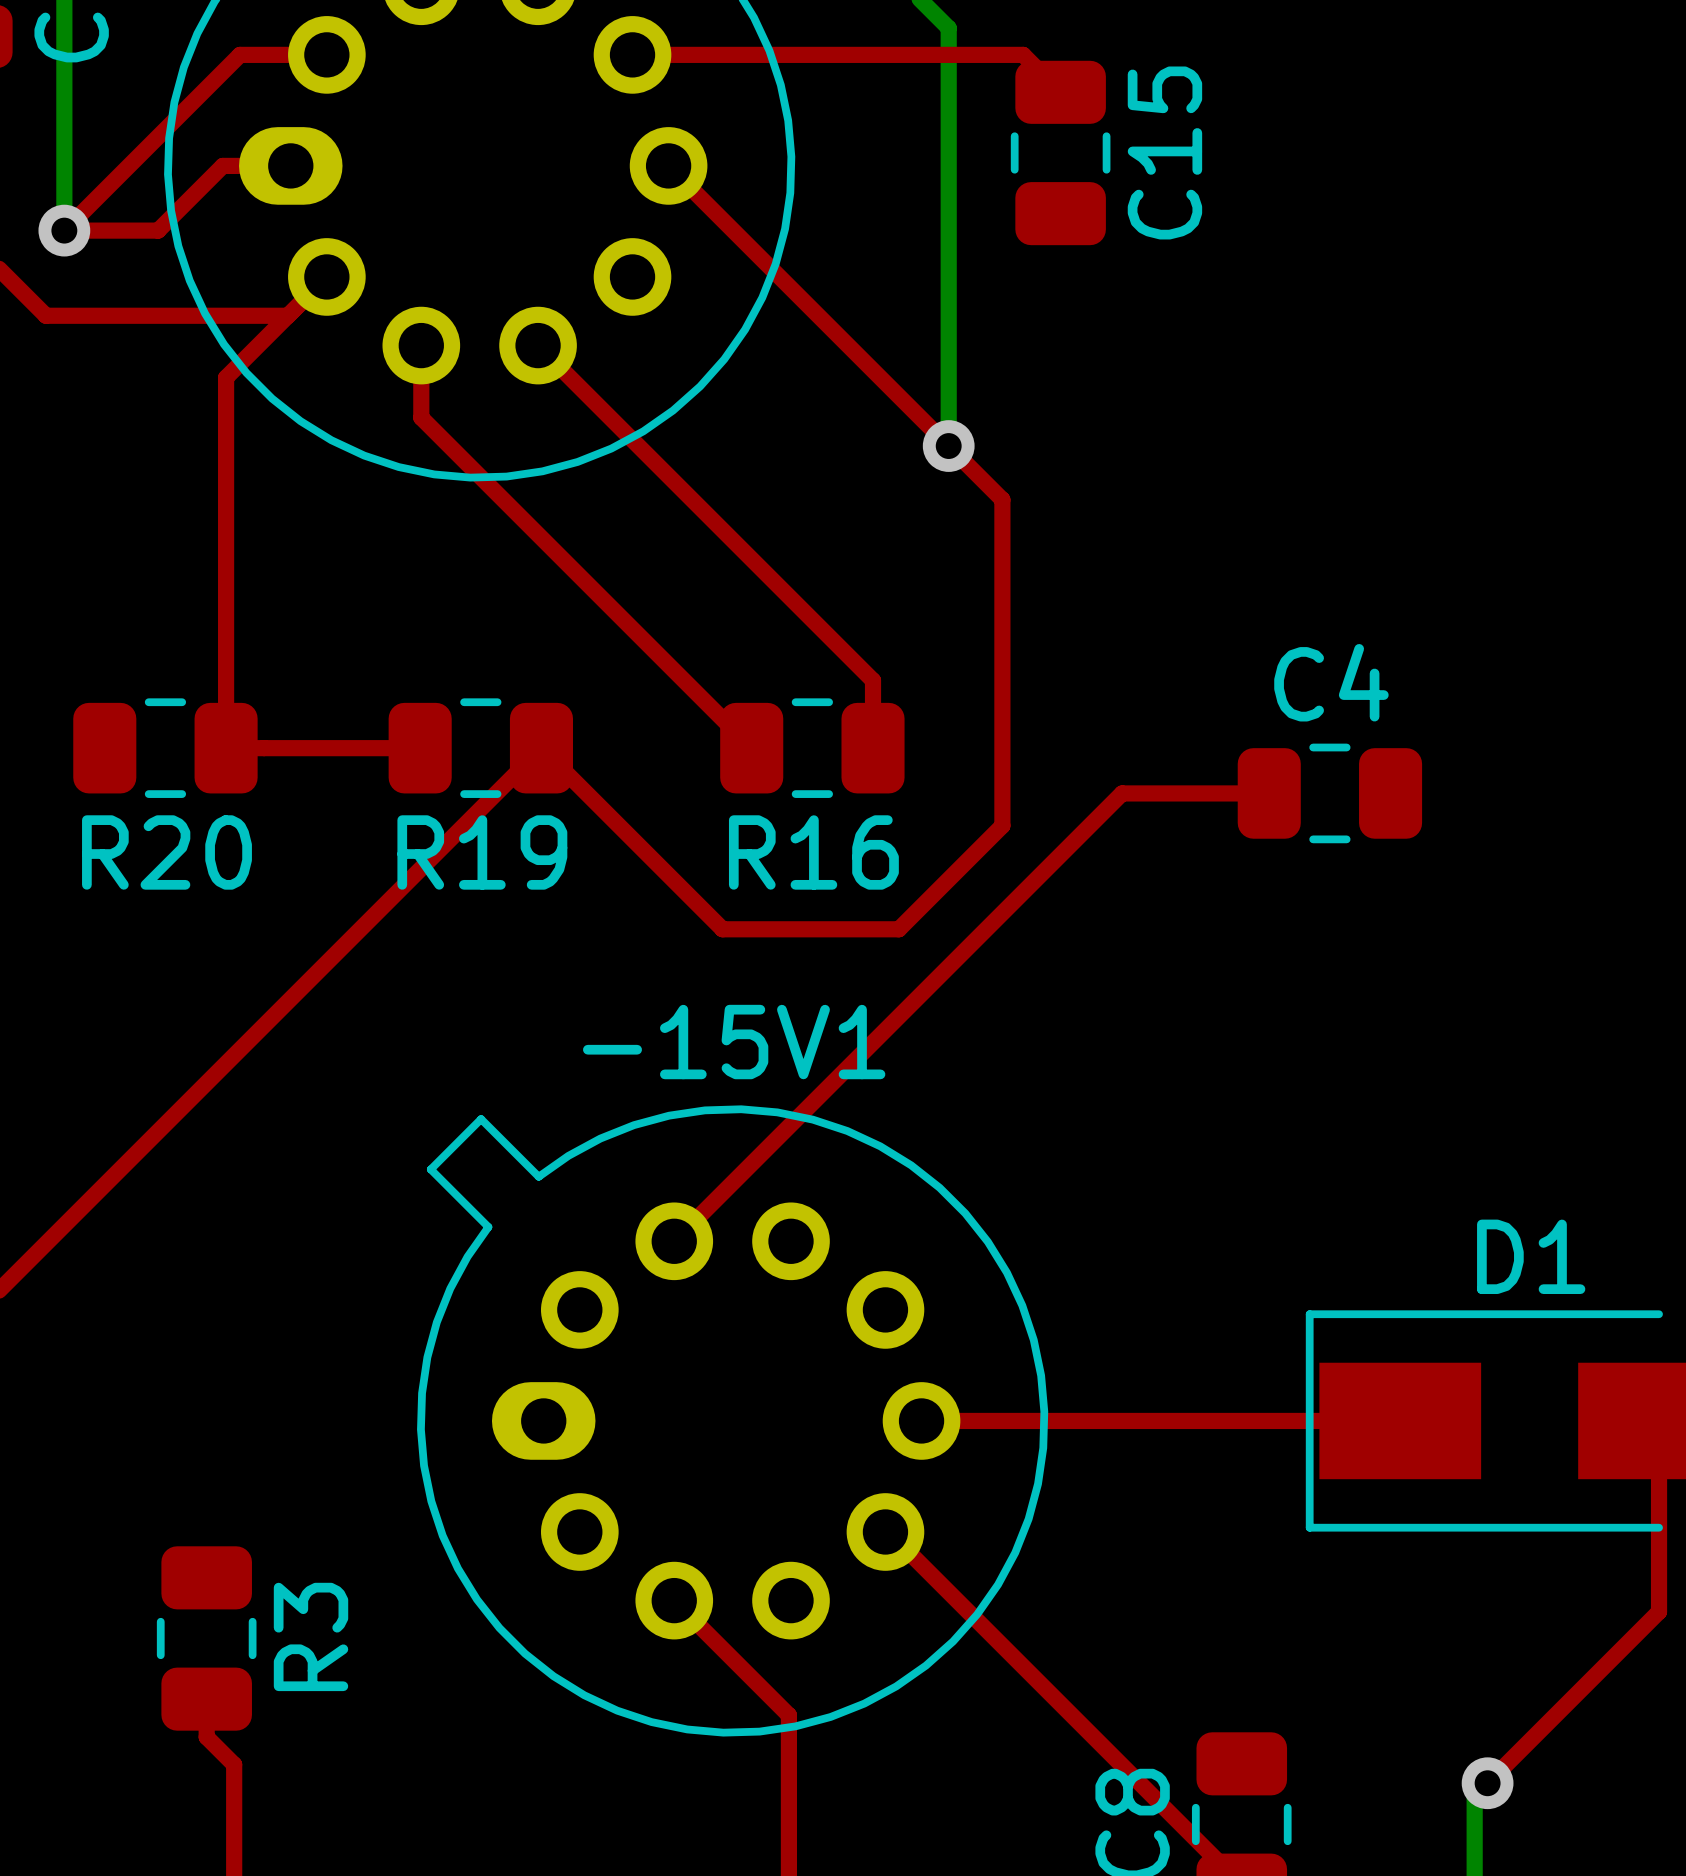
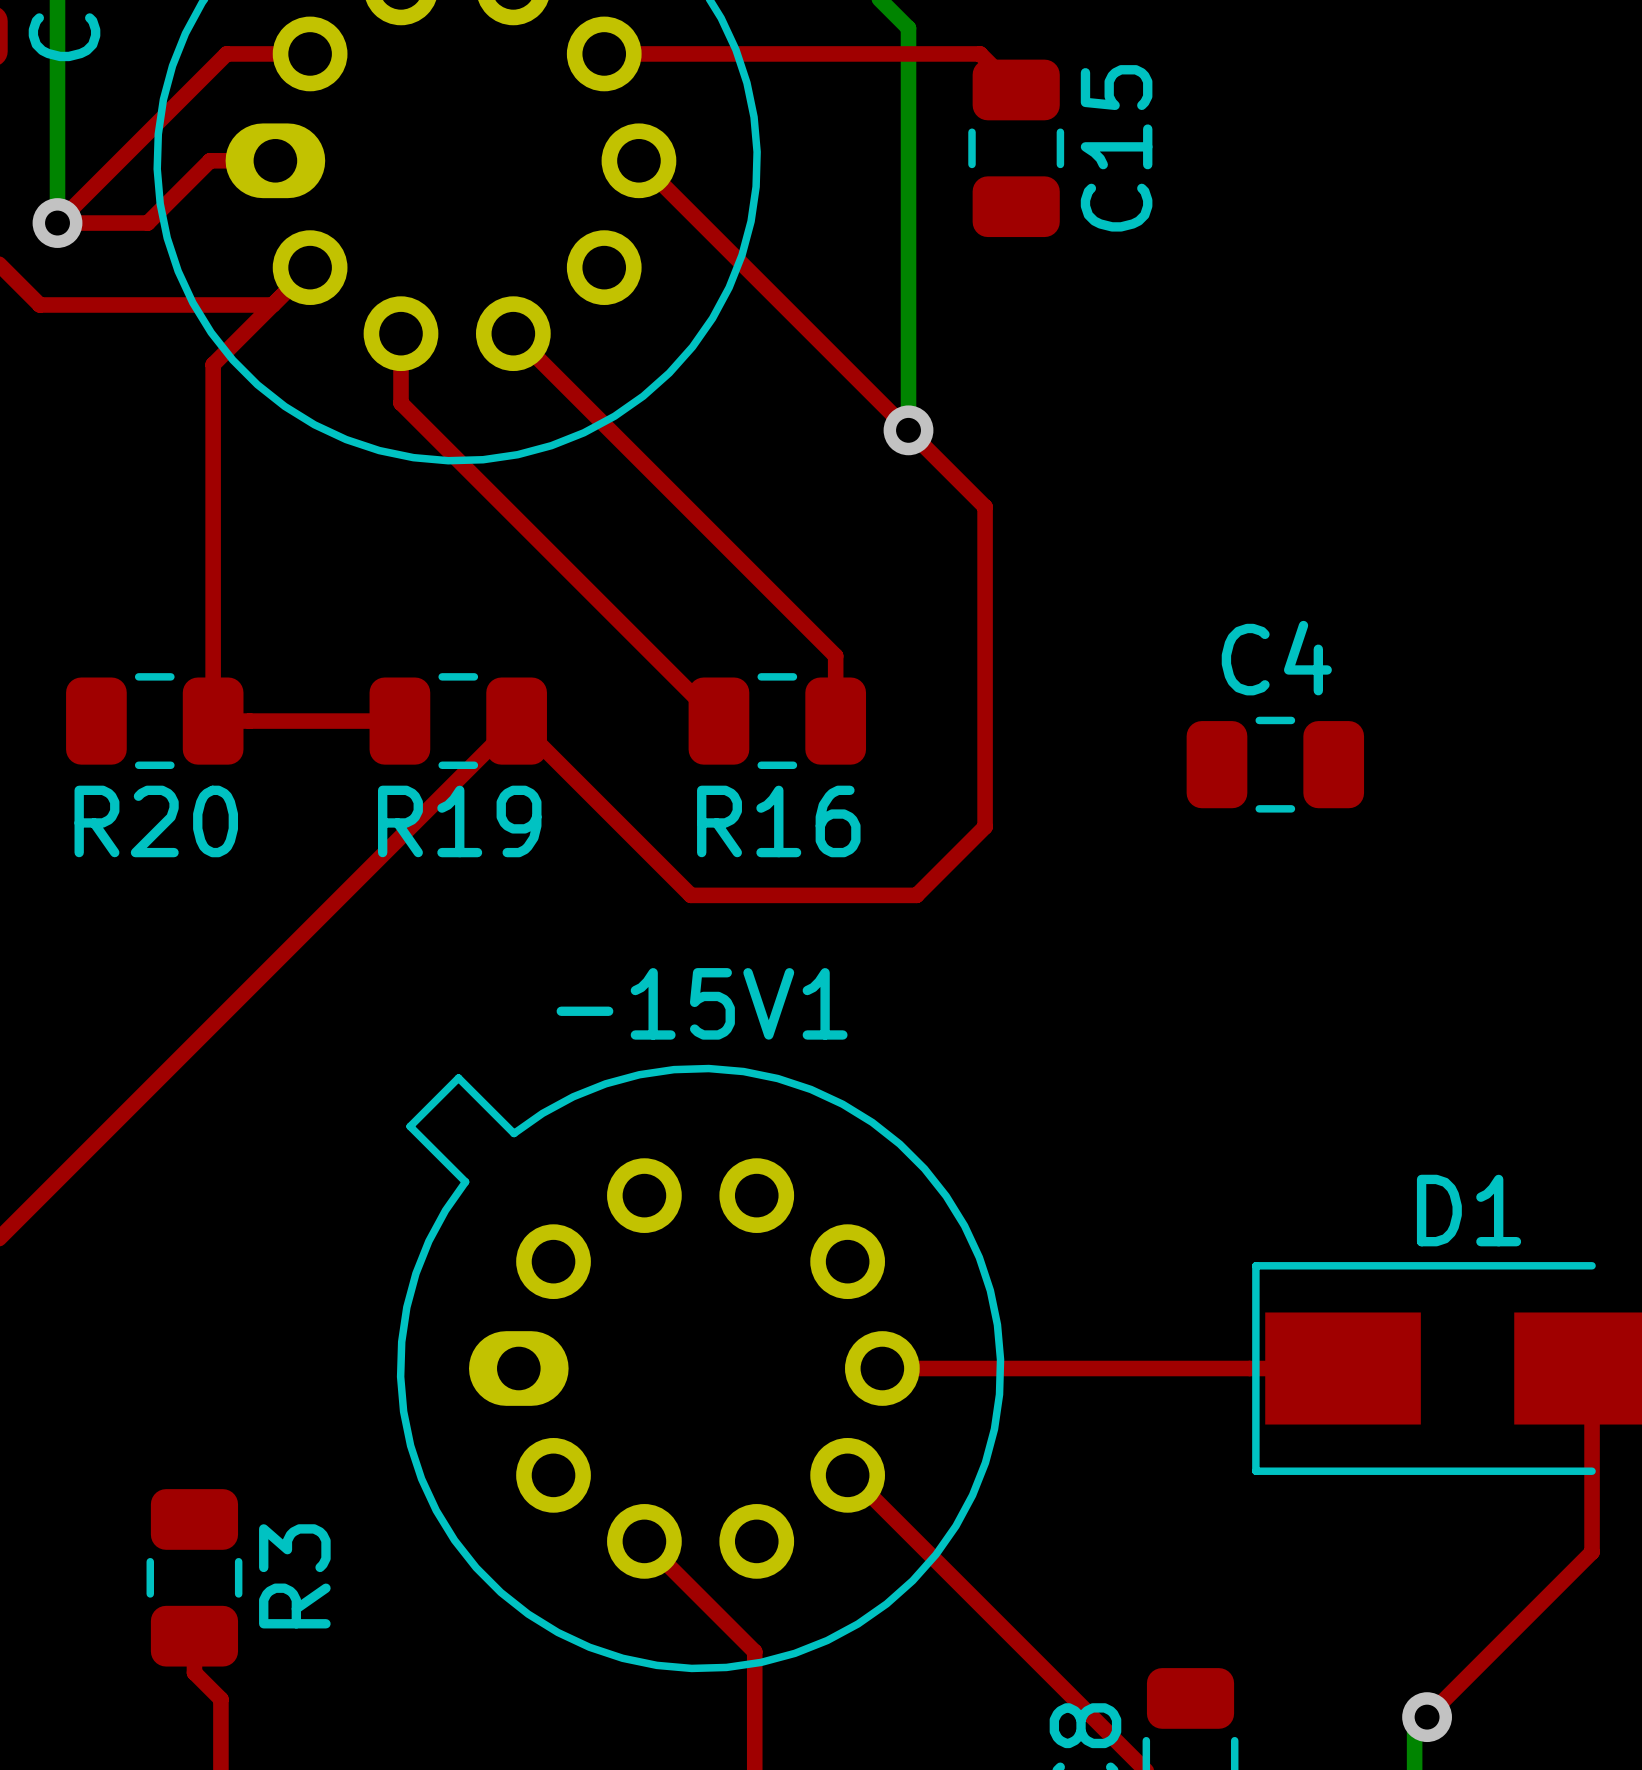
top track: (1002, 499) (1002, 825) (898, 929) -> (960, 482) (985, 506) (985, 826) (916, 895) (860, 895)
top track: (1269, 793) (1122, 793) (674, 1241) -> none

